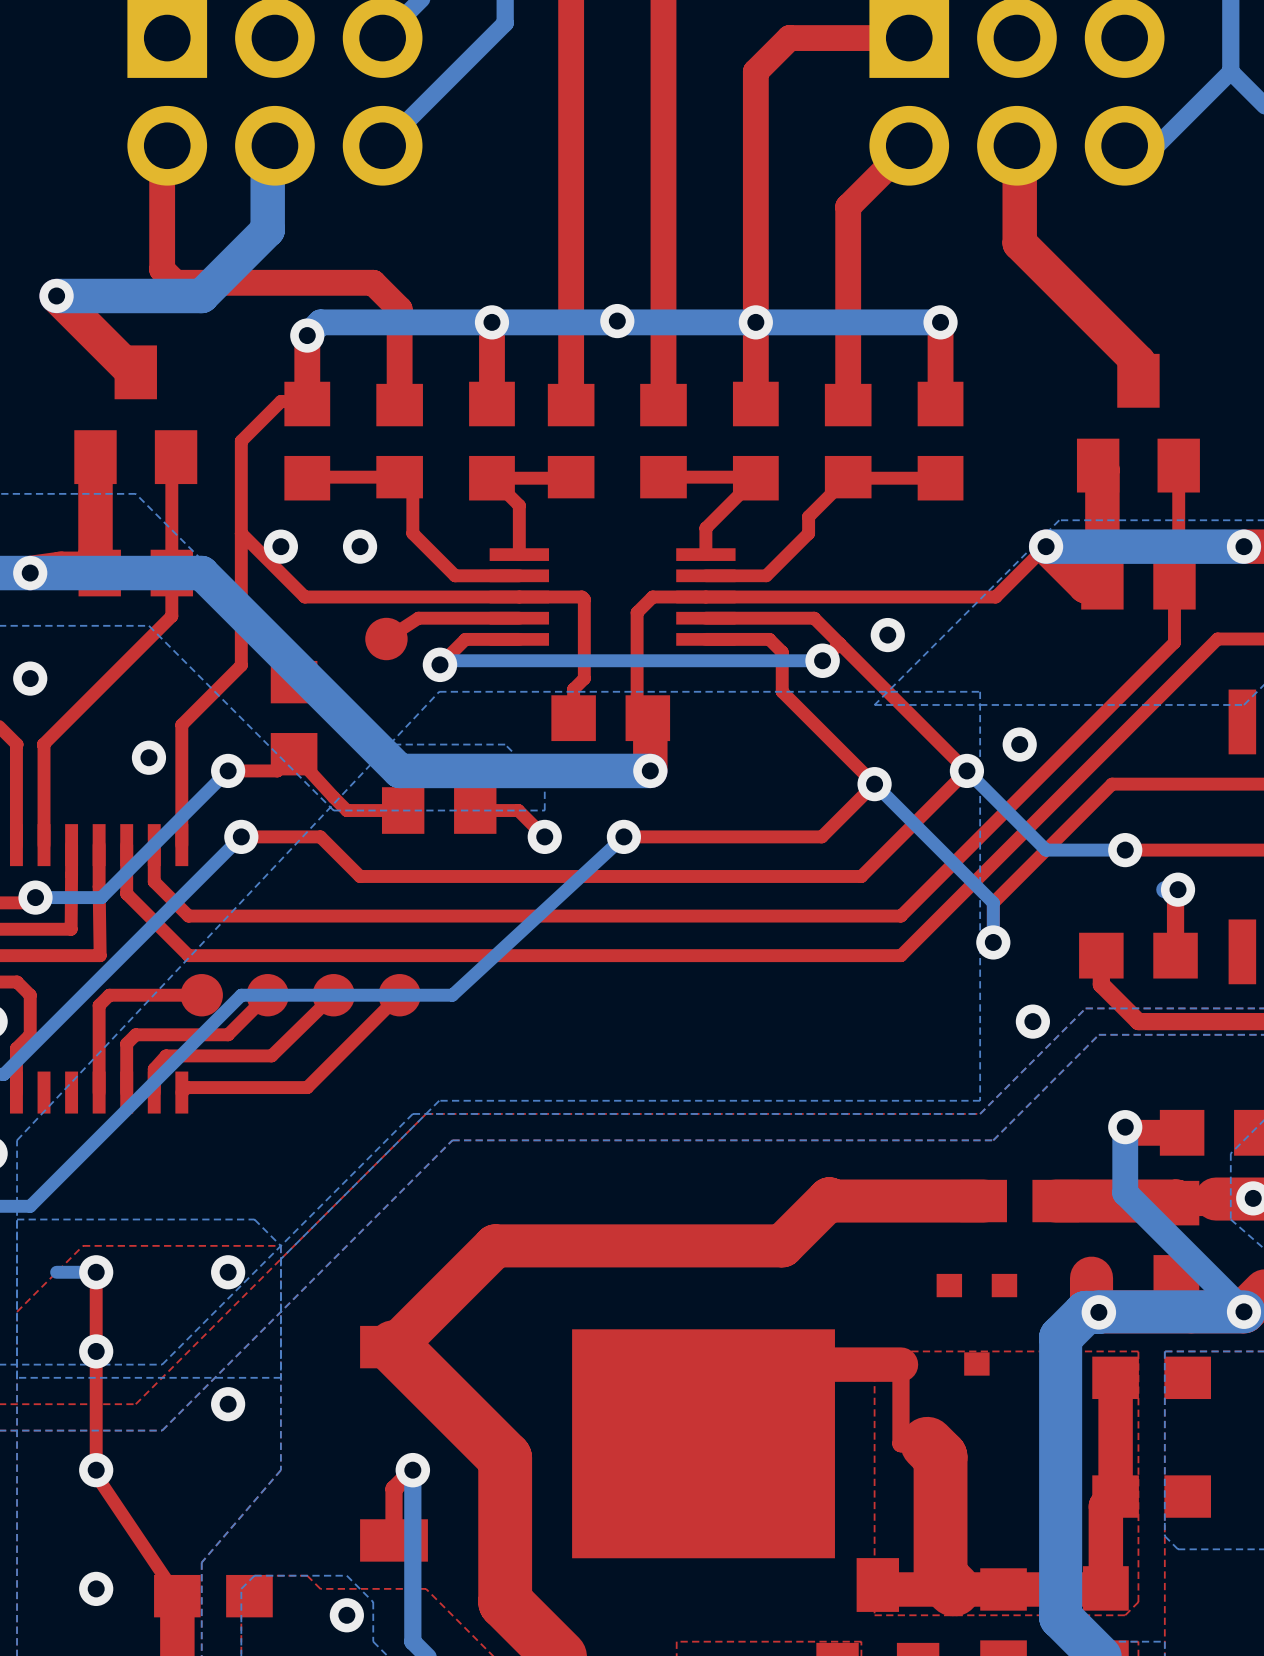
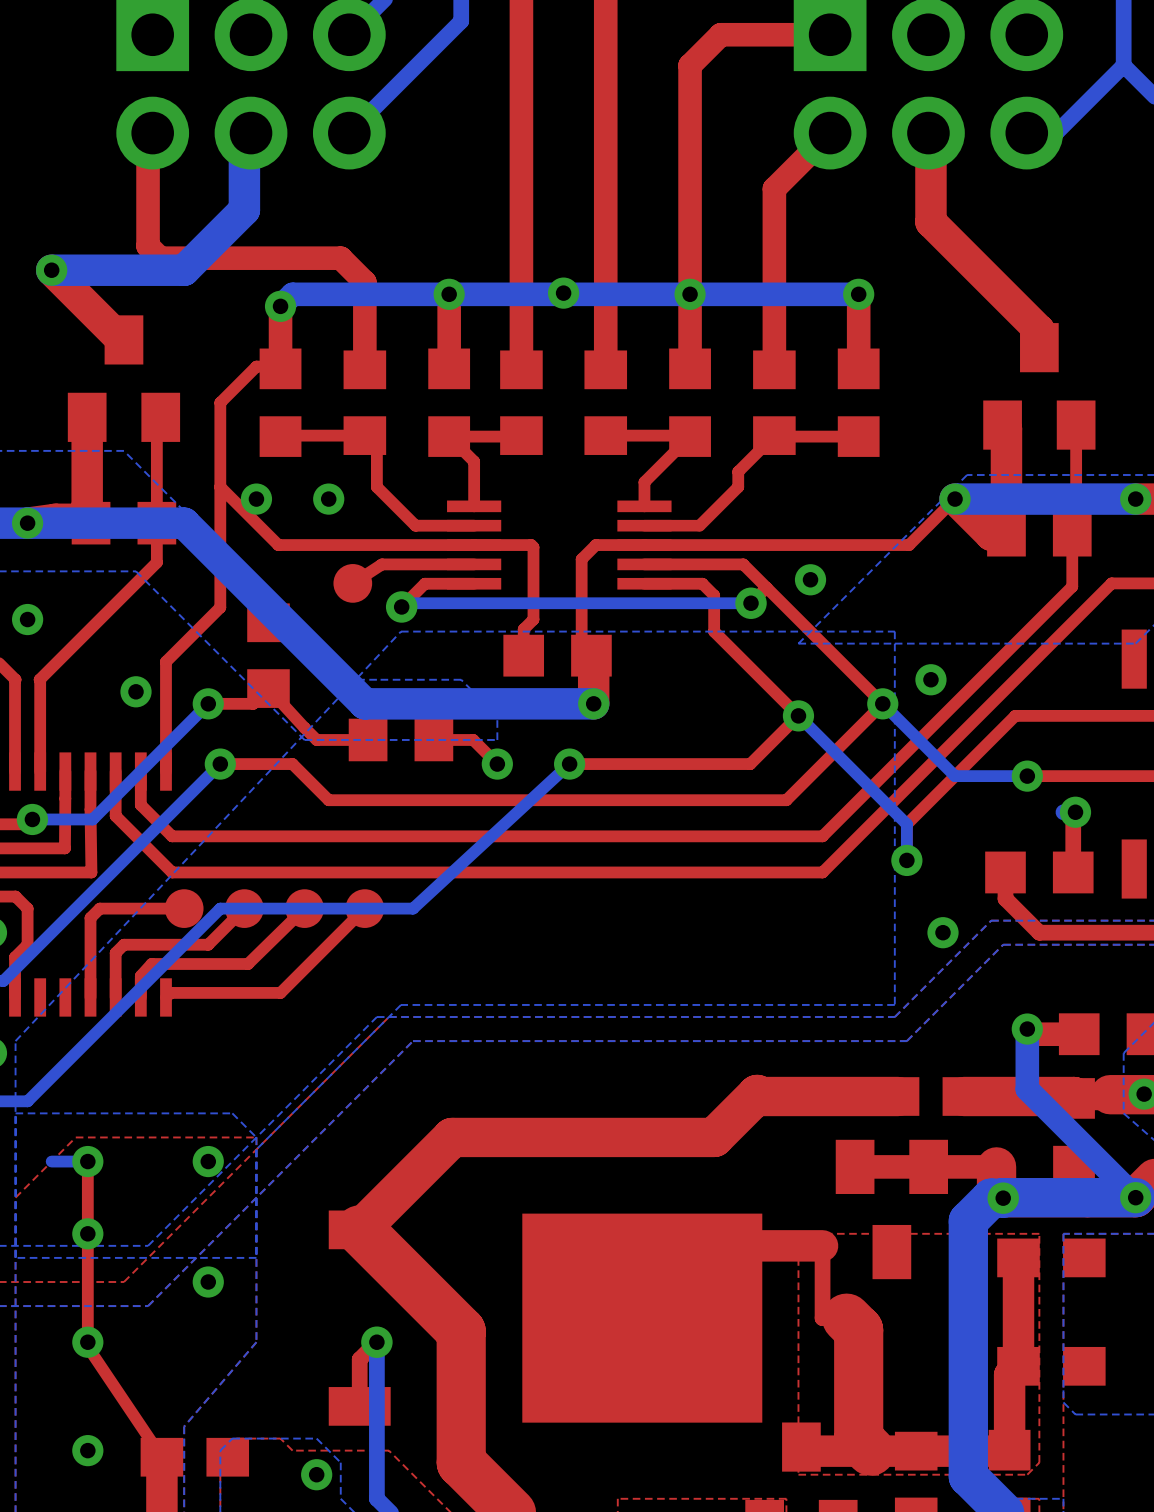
part footprint: [936, 1273, 1018, 1376] -> [835, 1139, 949, 1280]
top track: none -> (996, 1166) (855, 1166)

